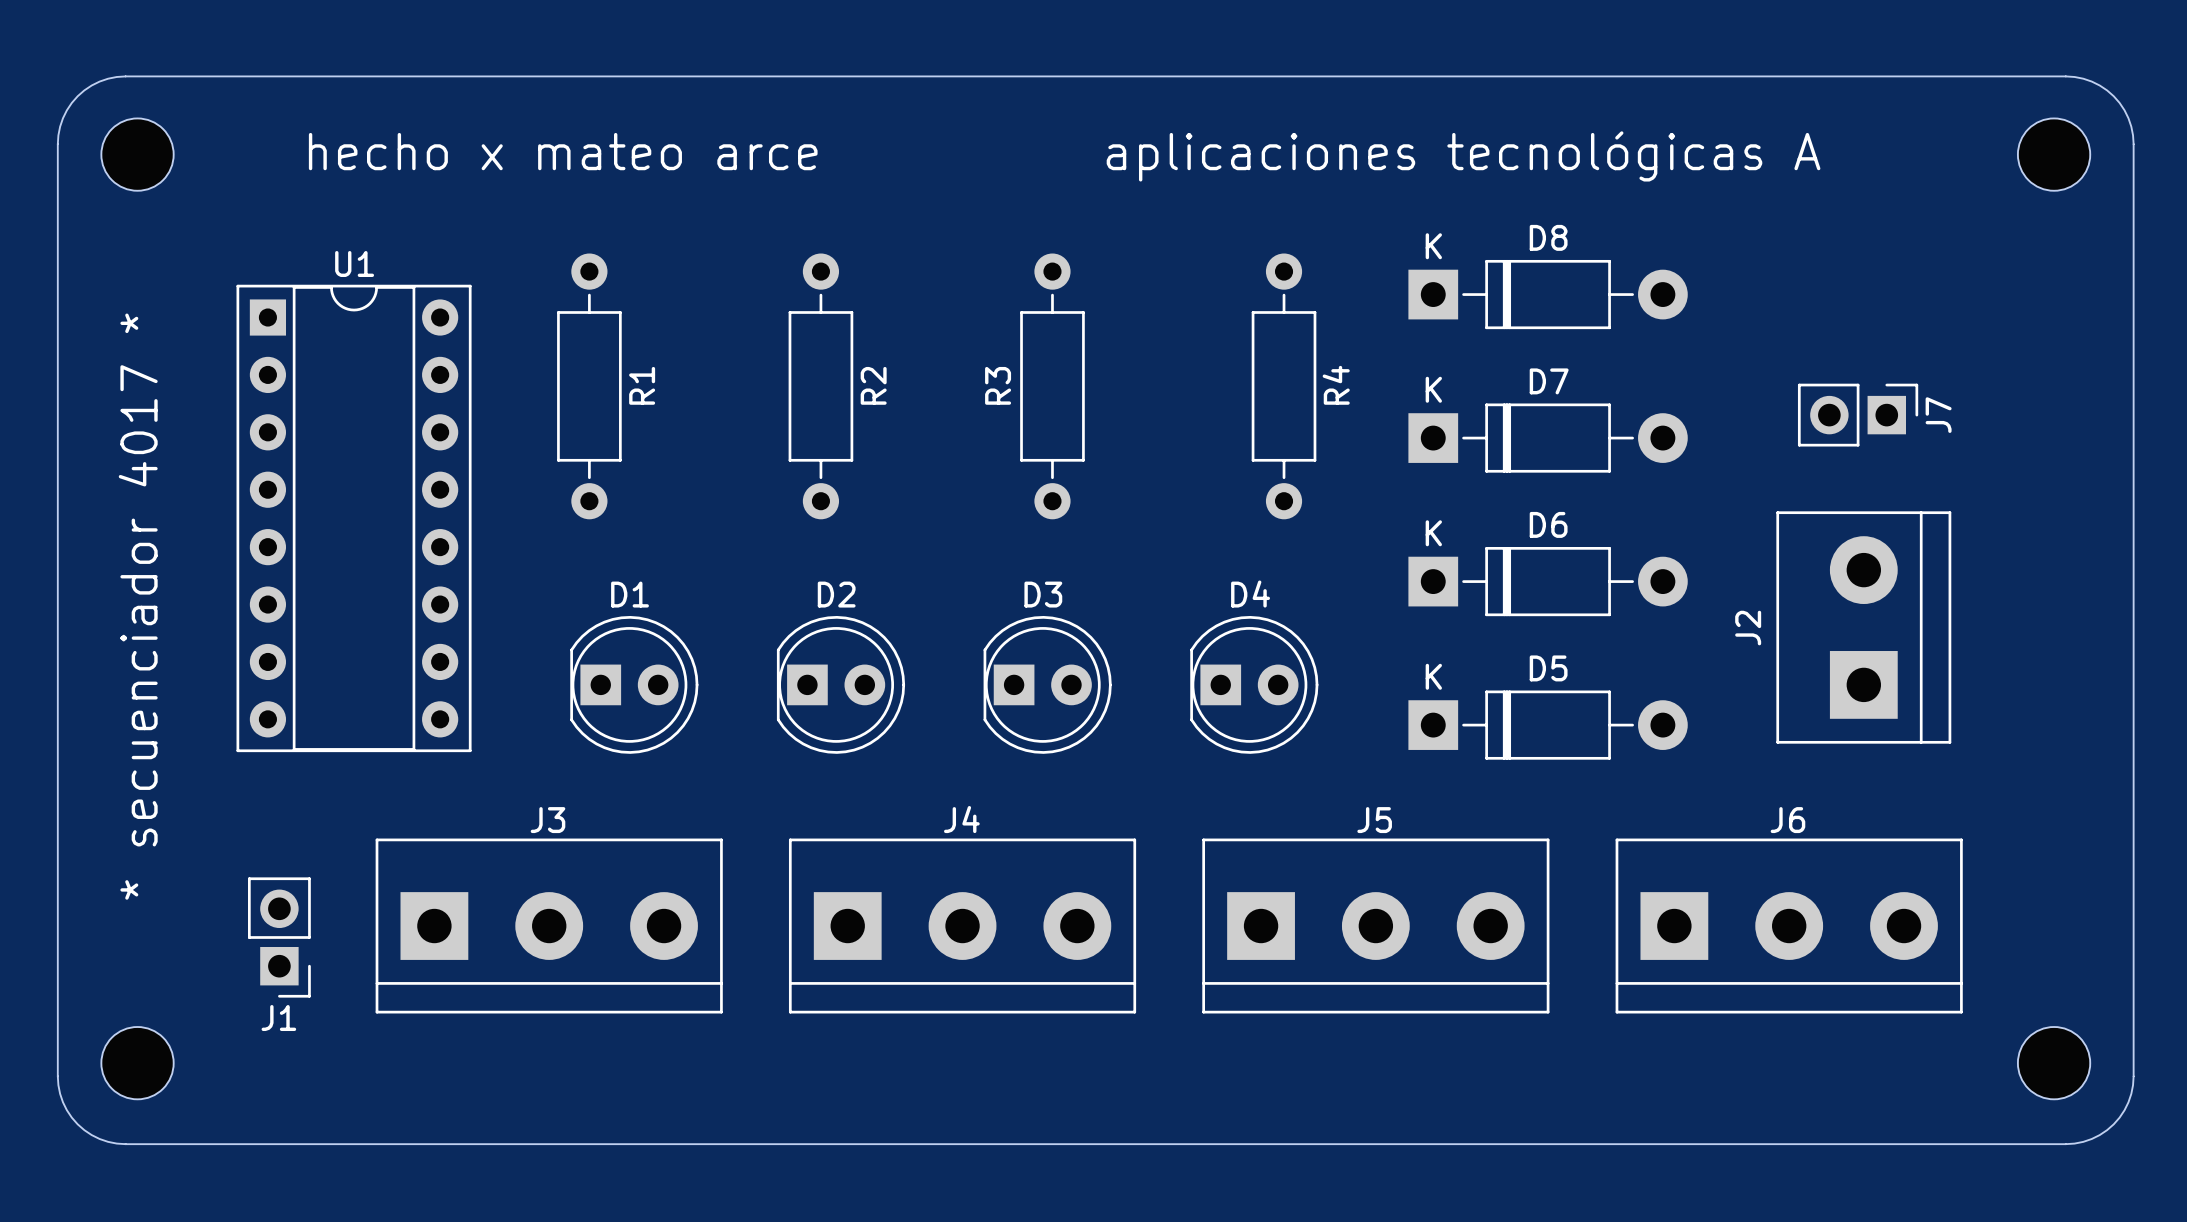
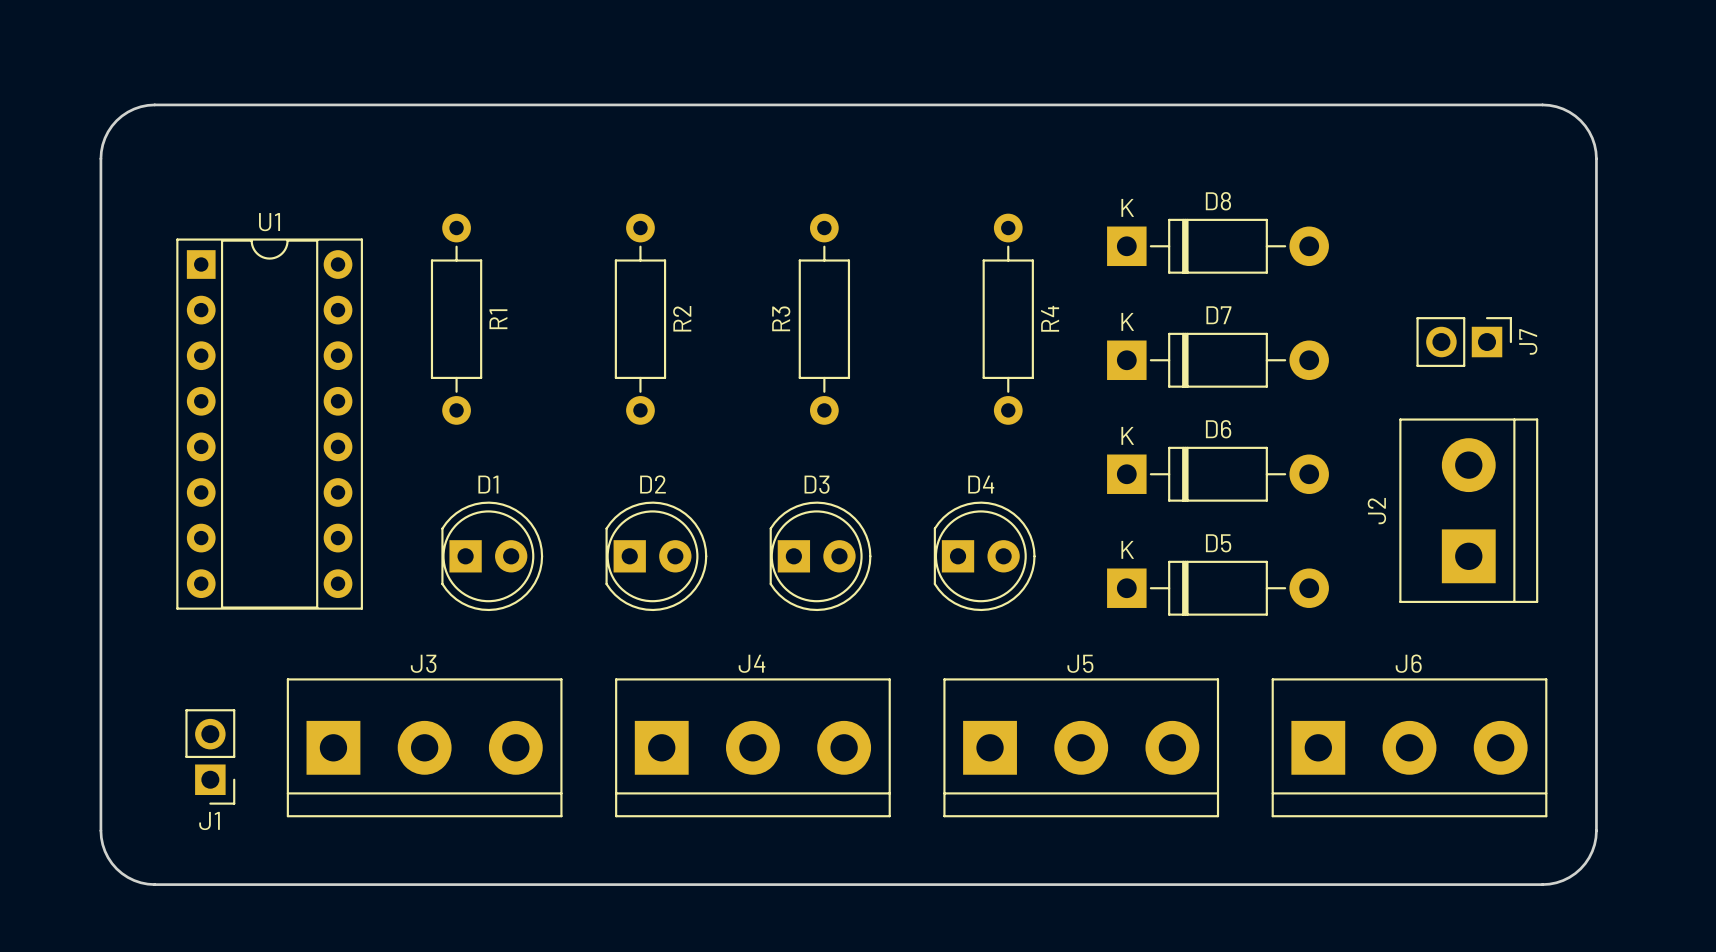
board edge: (125, 76) (2065, 76) (2083, 78) (2099, 85) (2113, 96) (2124, 110) (2131, 126) (2133, 144) (2133, 1076) (2131, 1093) (2124, 1110) (2113, 1124) (2099, 1135) (2083, 1141) (2065, 1144) (125, 1144) (108, 1141) (91, 1135) (77, 1124) (66, 1110) (60, 1093) (57, 1076) (57, 144) (62, 118) (77, 96) (99, 81) (125, 76) -> (154, 104) (134, 109) (116, 120) (105, 138) (100, 158) (100, 830) (102, 844) (108, 857) (116, 868) (127, 877) (140, 882) (154, 884) (1542, 884) (1556, 882) (1569, 877) (1580, 868) (1589, 857) (1594, 844) (1596, 830) (1596, 158) (1594, 144) (1589, 131) (1580, 120) (1569, 112) (1556, 106) (1542, 104) (154, 104)
text: hecho x mateo arce (563, 151) -> none
part: (137, 154) -> none
part: (2054, 154) -> none
text: aplicaciones tecnológicas A (1463, 156) -> none
text: * secuenciador 4017 * (138, 606) -> none
part: (137, 1063) -> none
part: (2054, 1063) -> none

